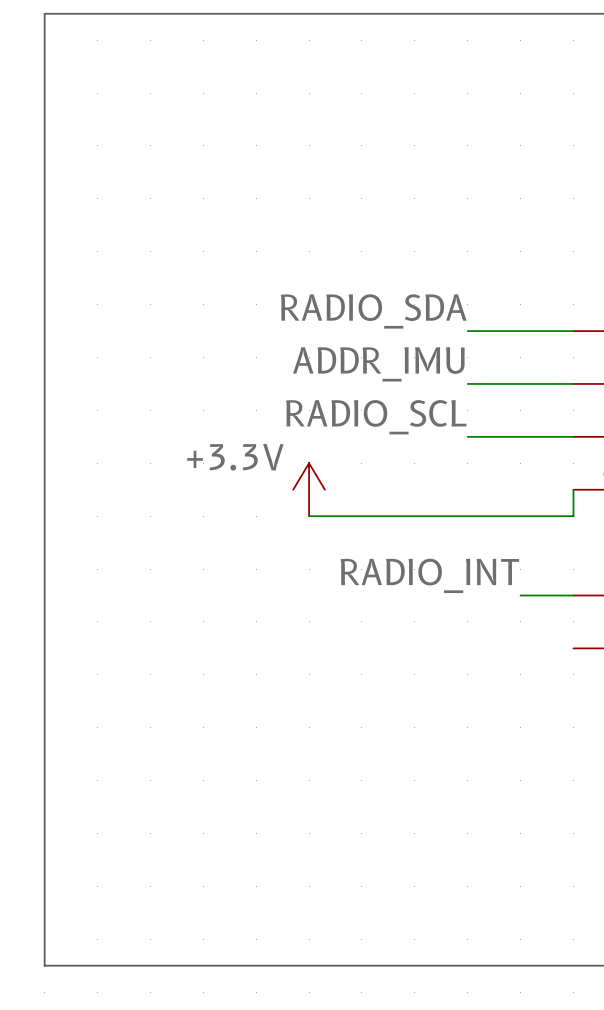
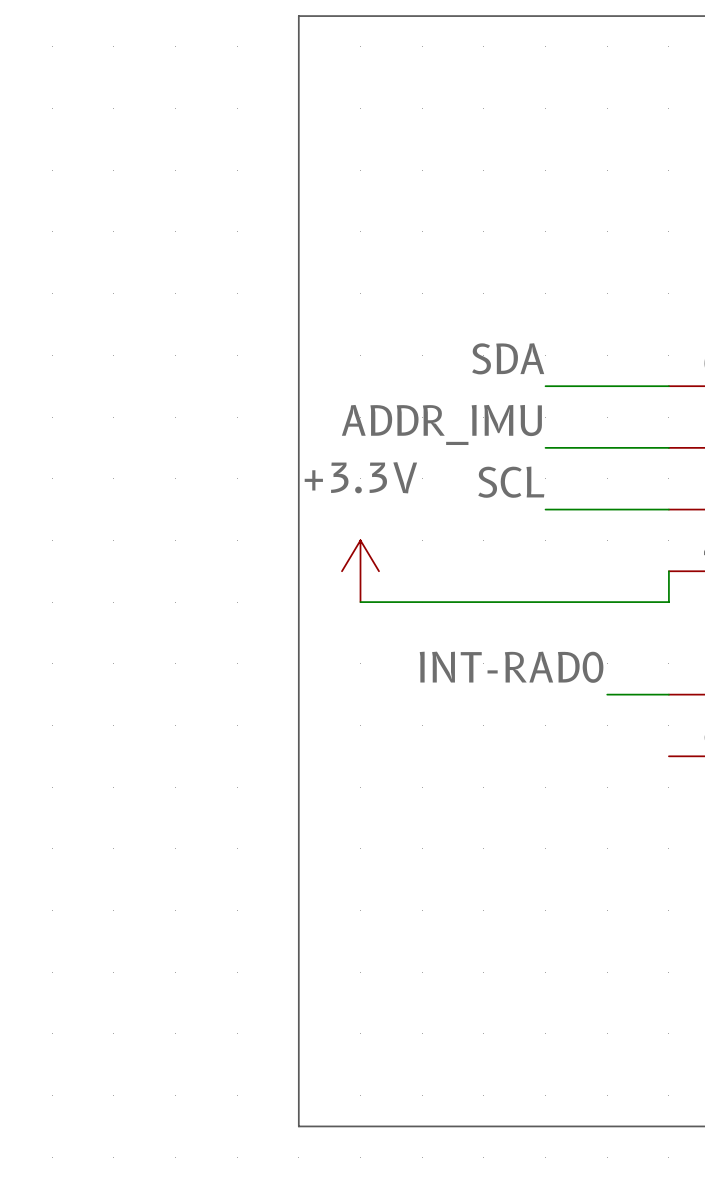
line: (256, 13) (44, 13) (44, 965) (256, 965) -> (298, 16) (298, 1126)
label: RADIO_SDA (373, 311) -> SDA (508, 358)
label: RADIO_SCL (376, 417) -> SCL (511, 482)
power symbol text position: +3.3V (235, 457) -> +3.3V (360, 477)
label: RADIO_INT (429, 575) -> INT-RAD0 (511, 667)

